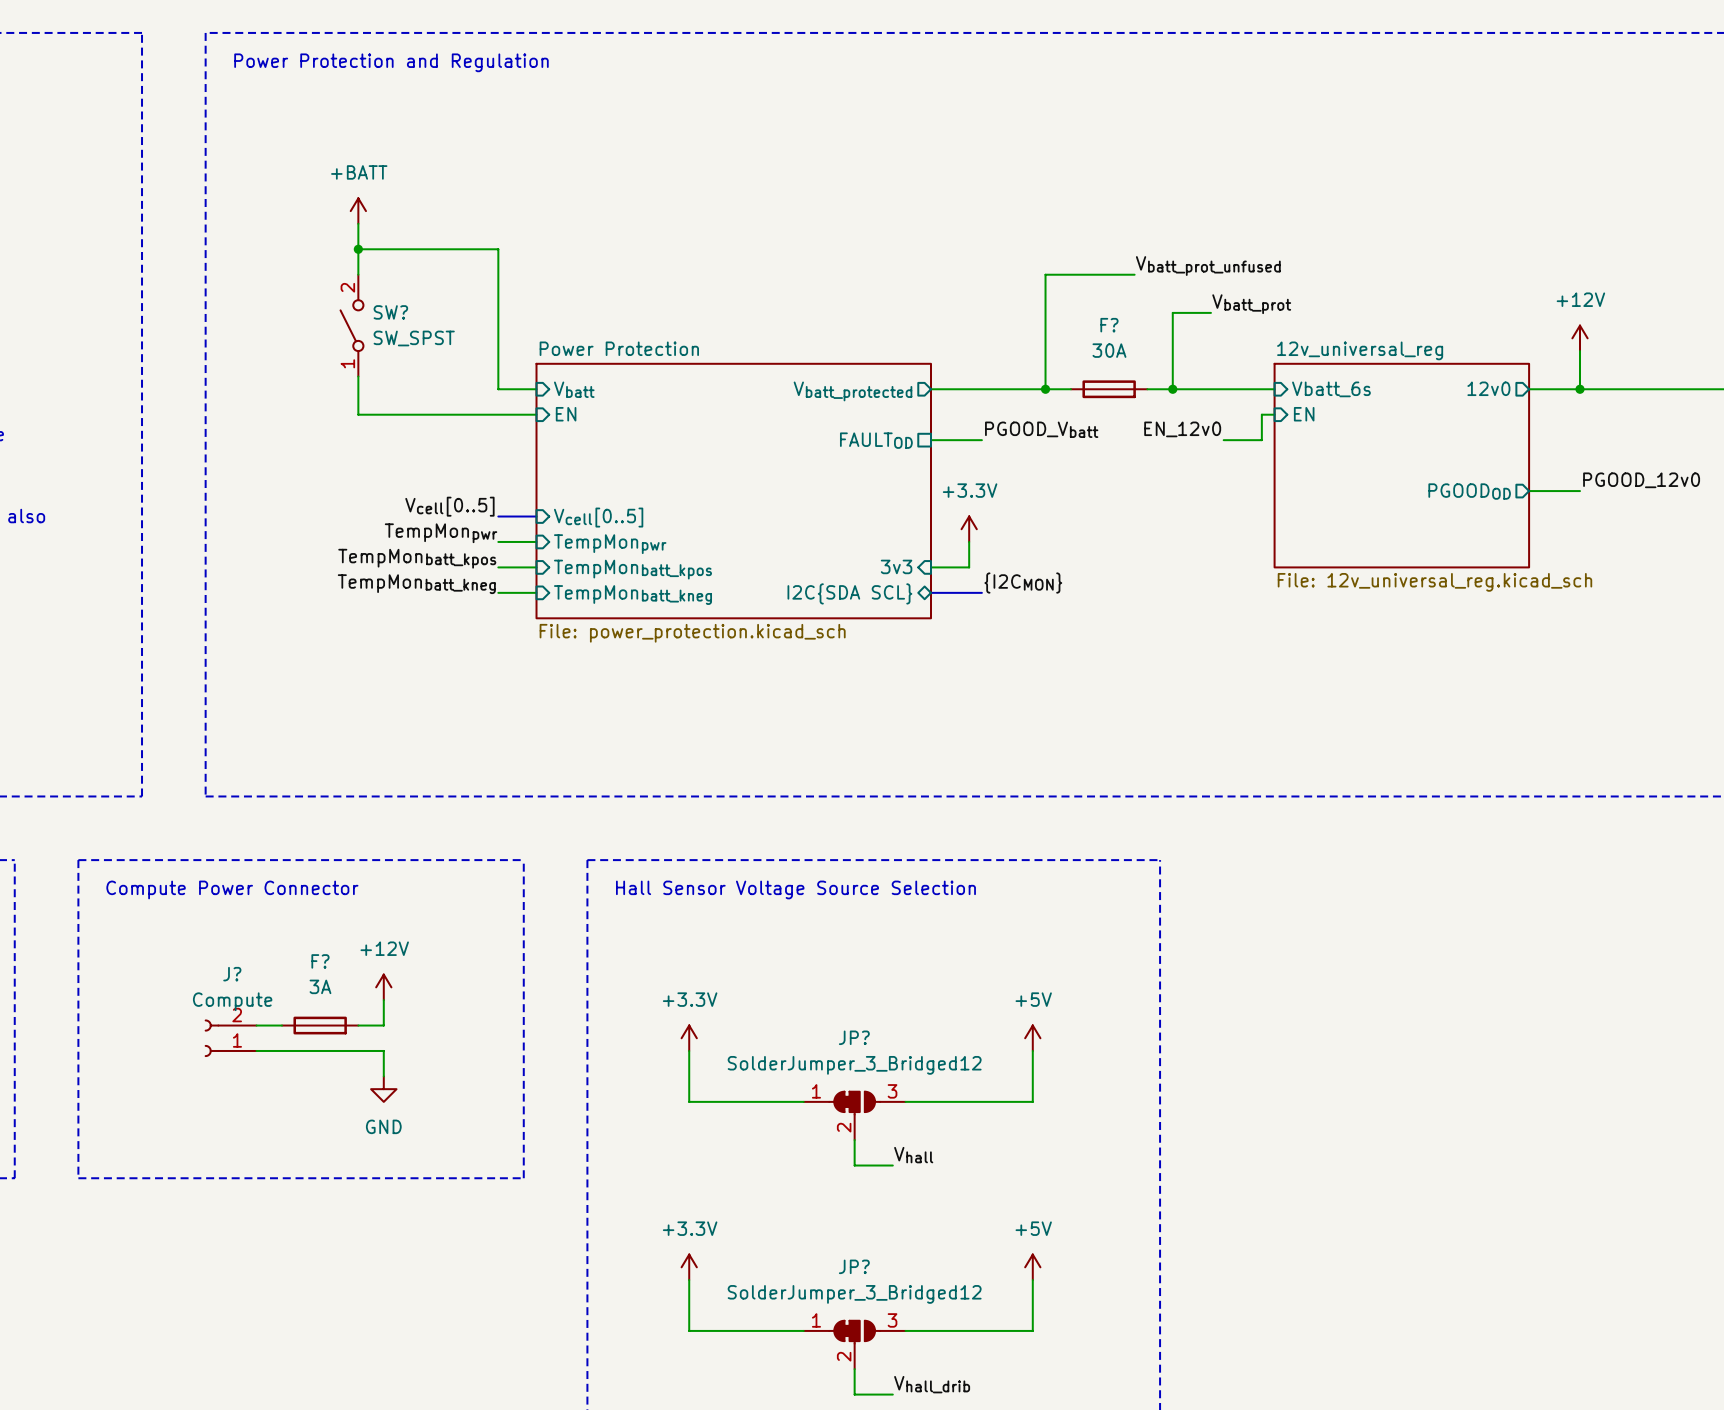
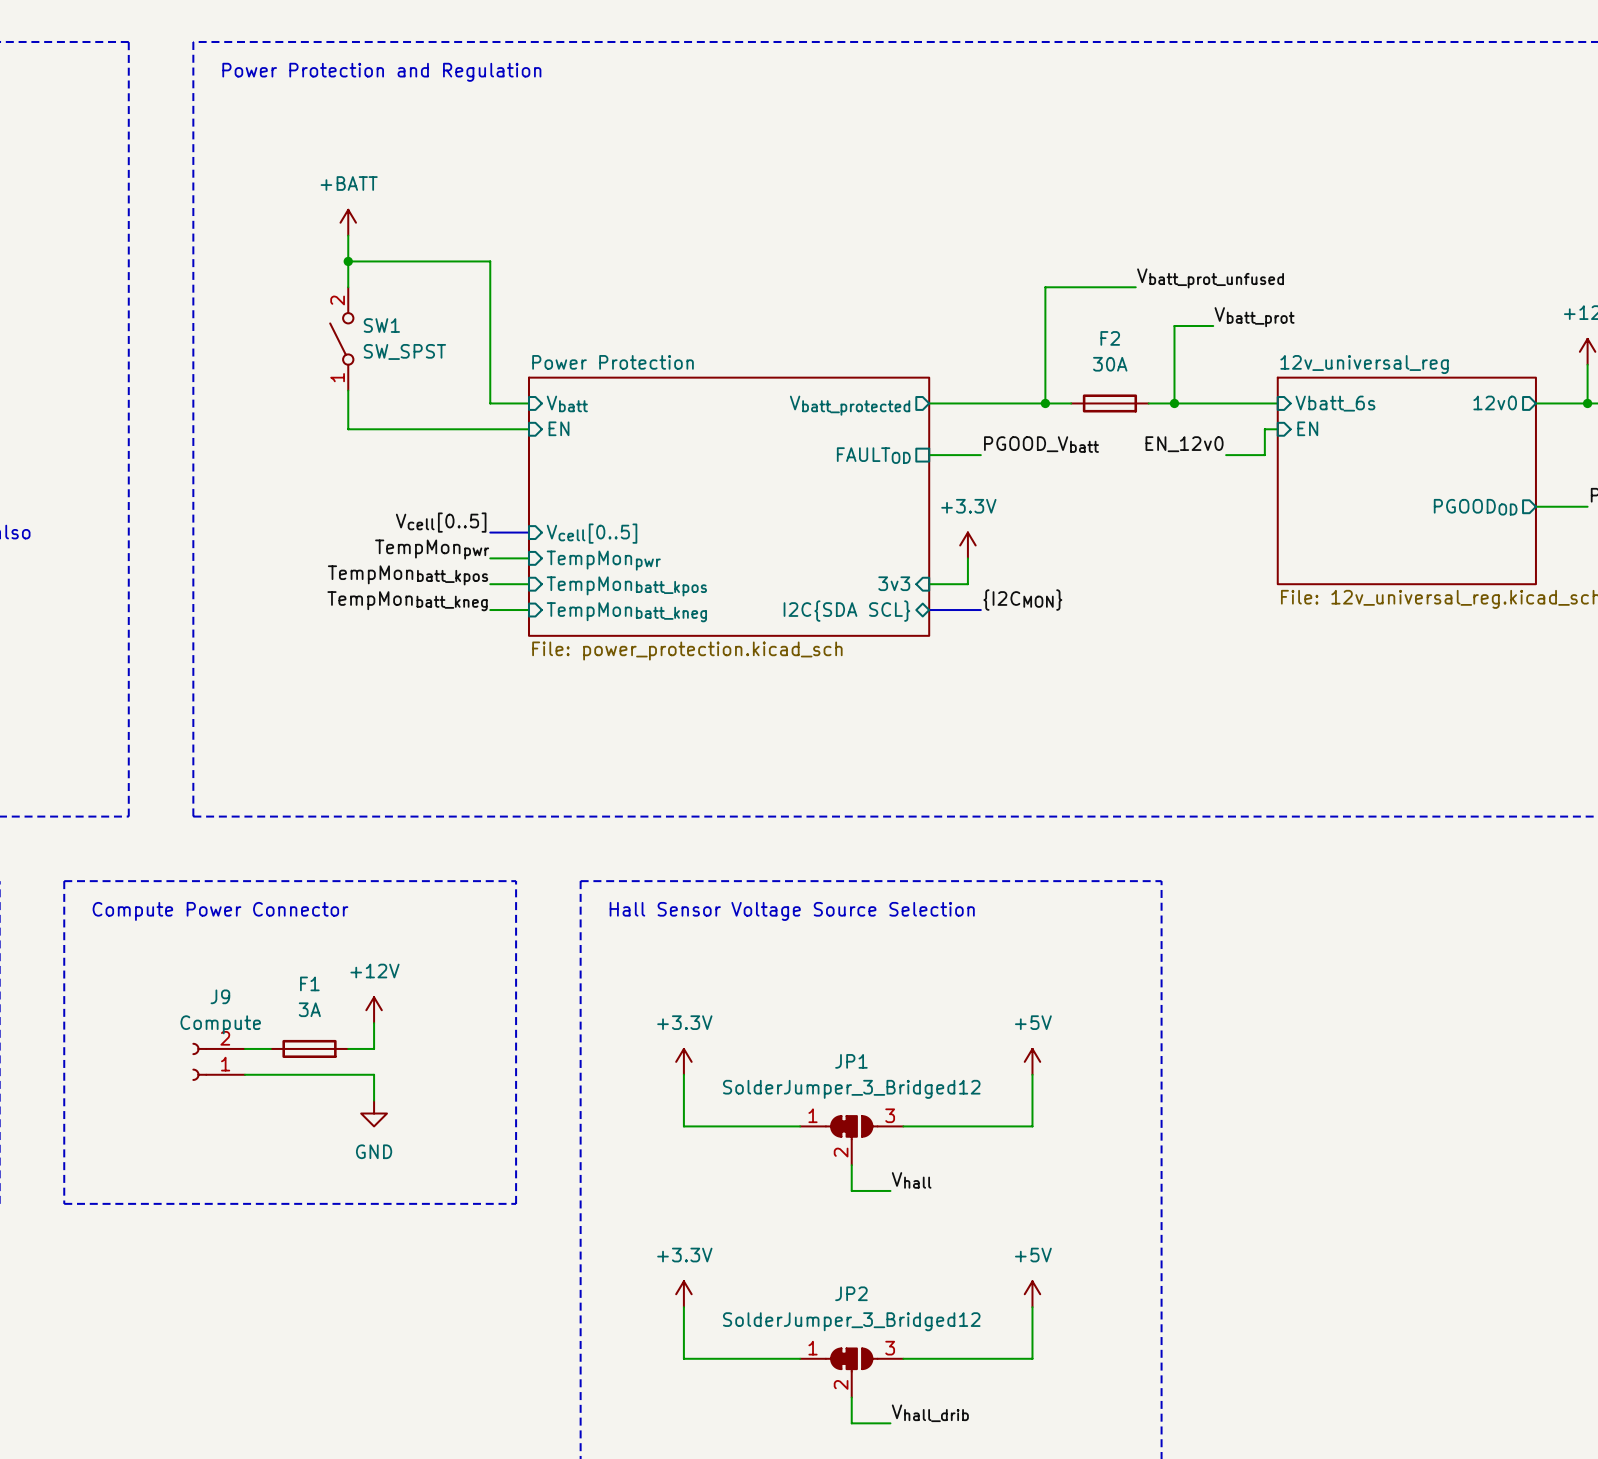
SW? name: SW? (390, 312) -> SW1 (381, 325)
F? name: F? (1109, 325) -> F2 (1110, 338)
F? name: F? (320, 961) -> F1 (309, 983)
J? name: J? (232, 974) -> J9 (220, 996)
JP? name: JP? (854, 1037) -> JP1 (851, 1061)
JP? name: JP? (854, 1266) -> JP2 (851, 1293)

